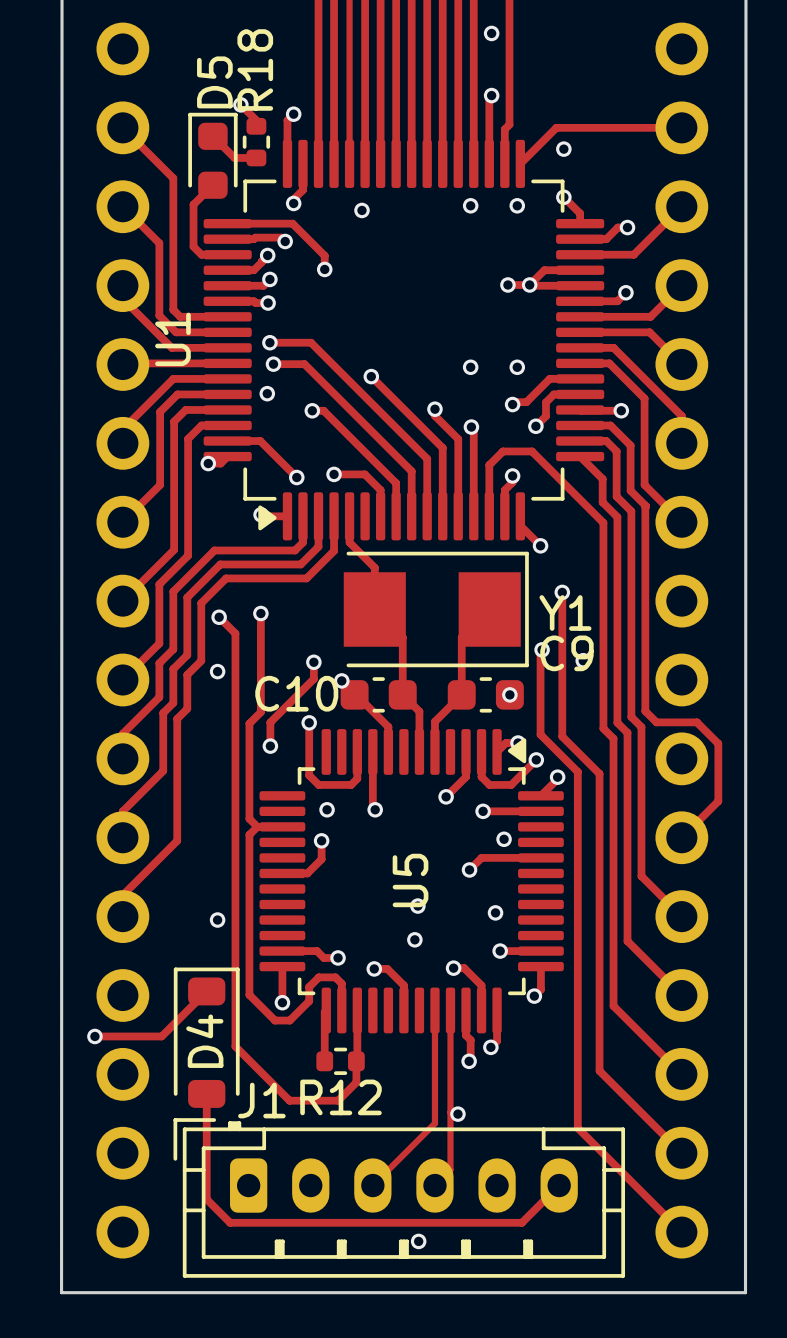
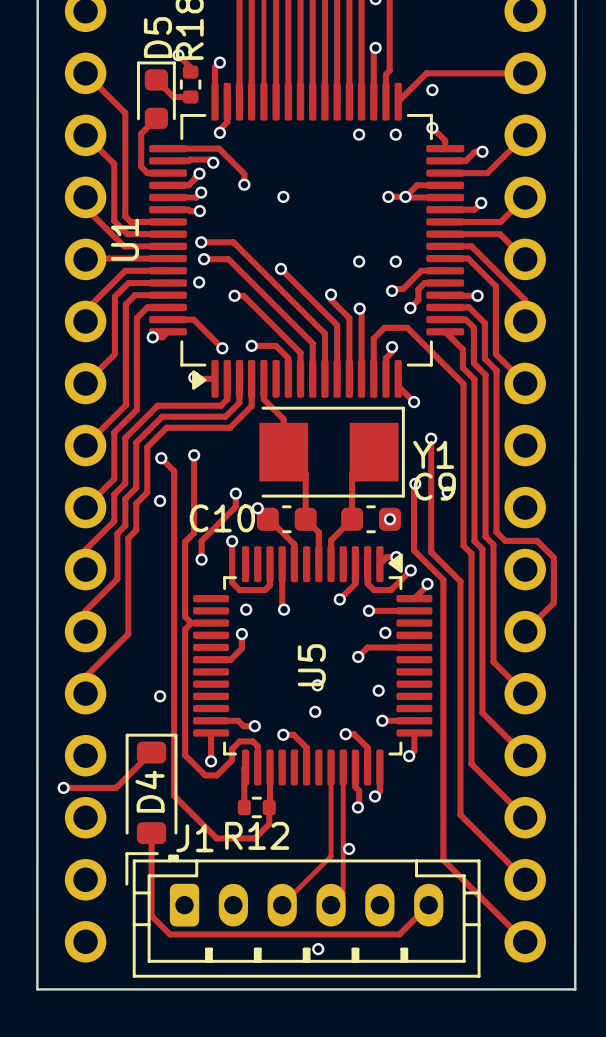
via position: (361, 210) -> (283, 196)

